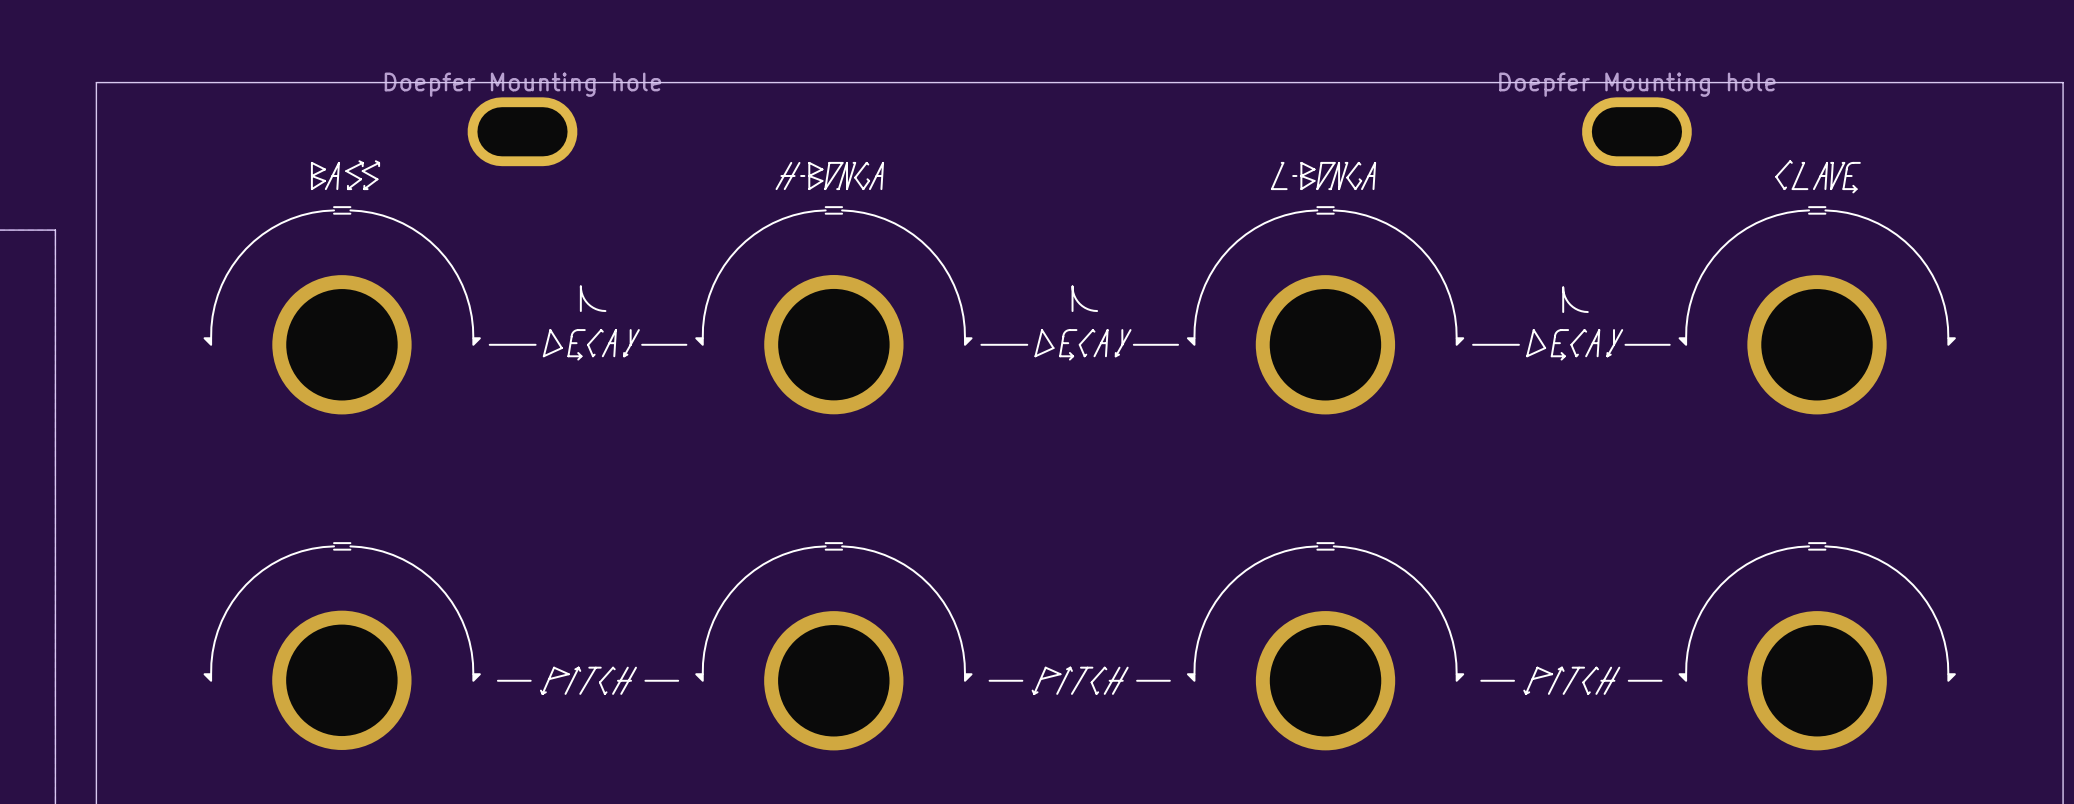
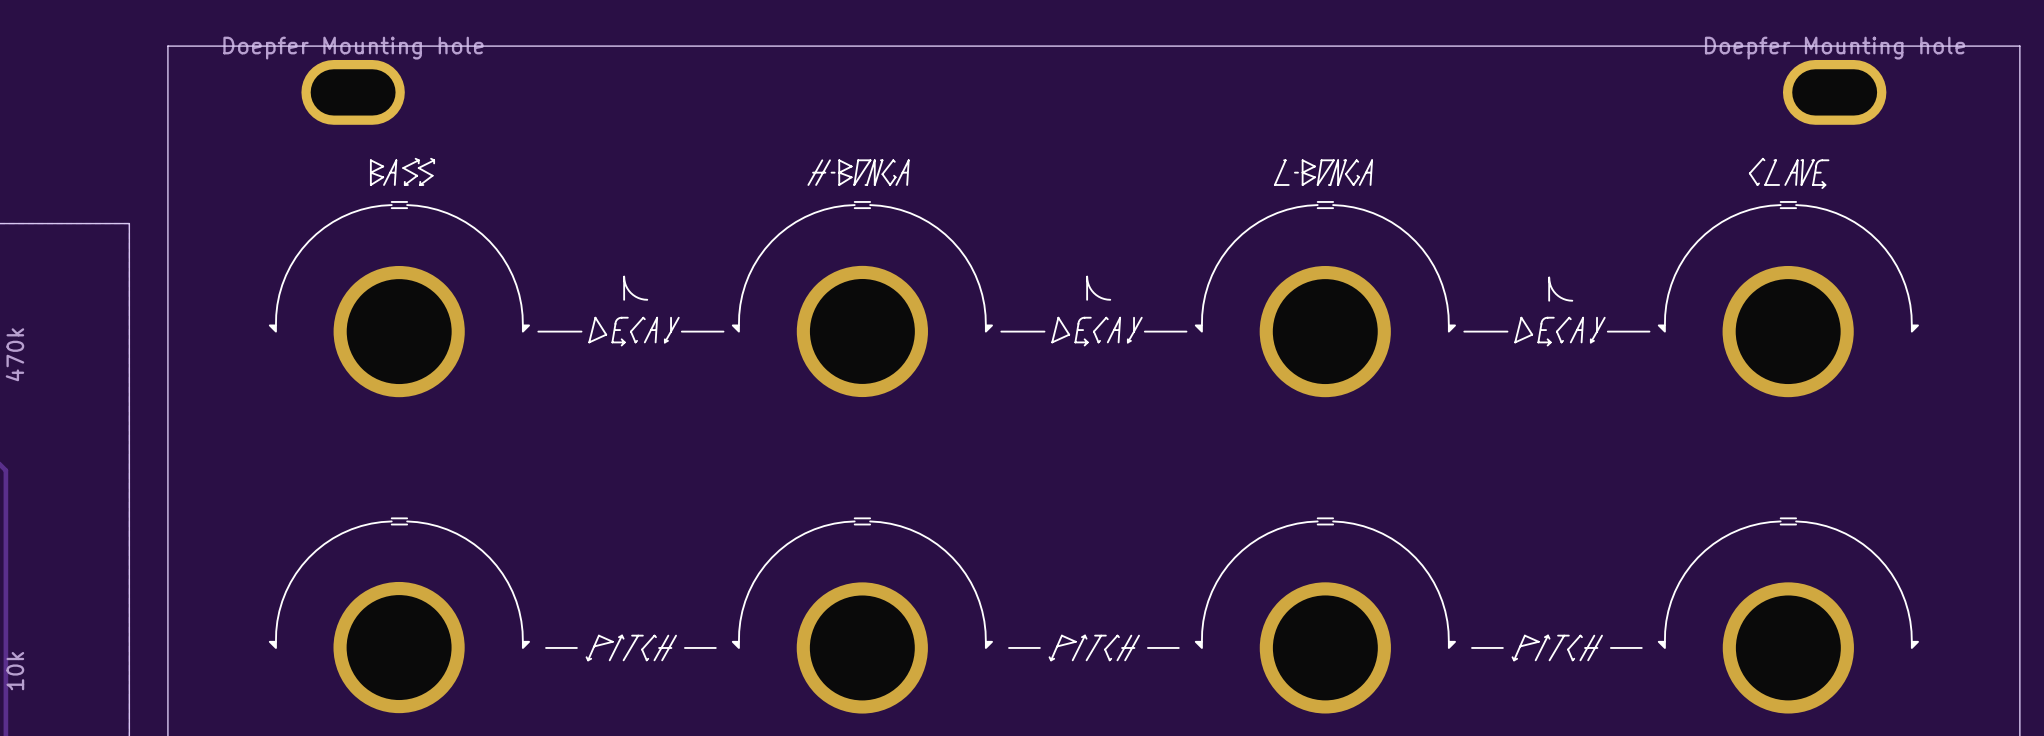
board edge: (96, 82) (2063, 82) -> (167, 84) (167, 46) (2019, 46) (2019, 84)
part position: (522, 131) -> (353, 92)
part position: (1636, 131) -> (1834, 92)

